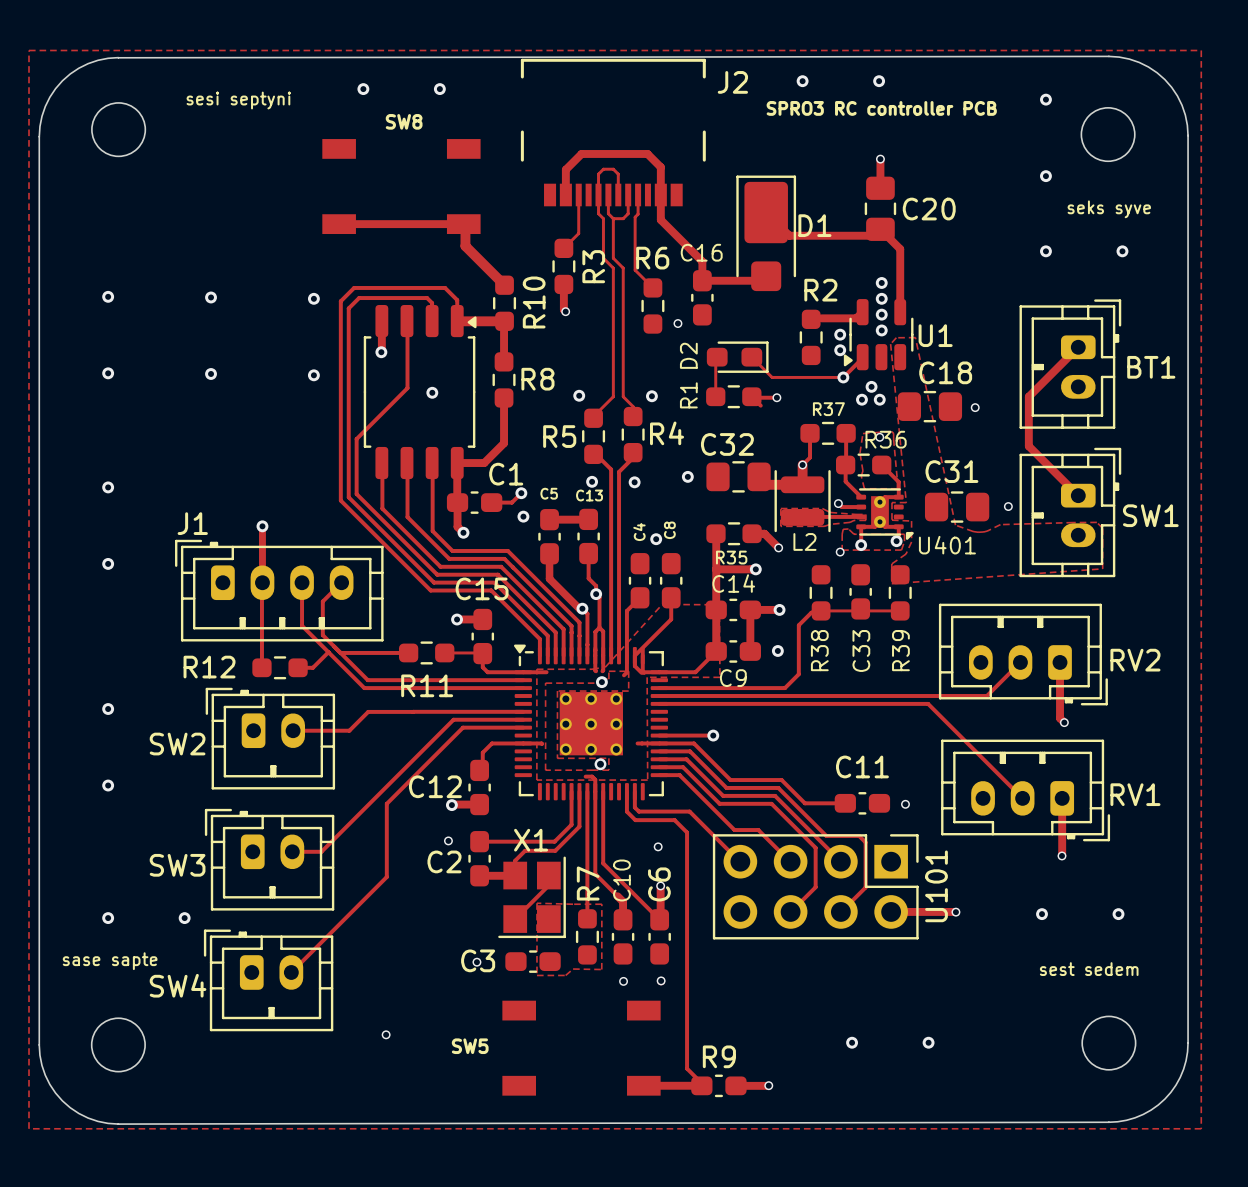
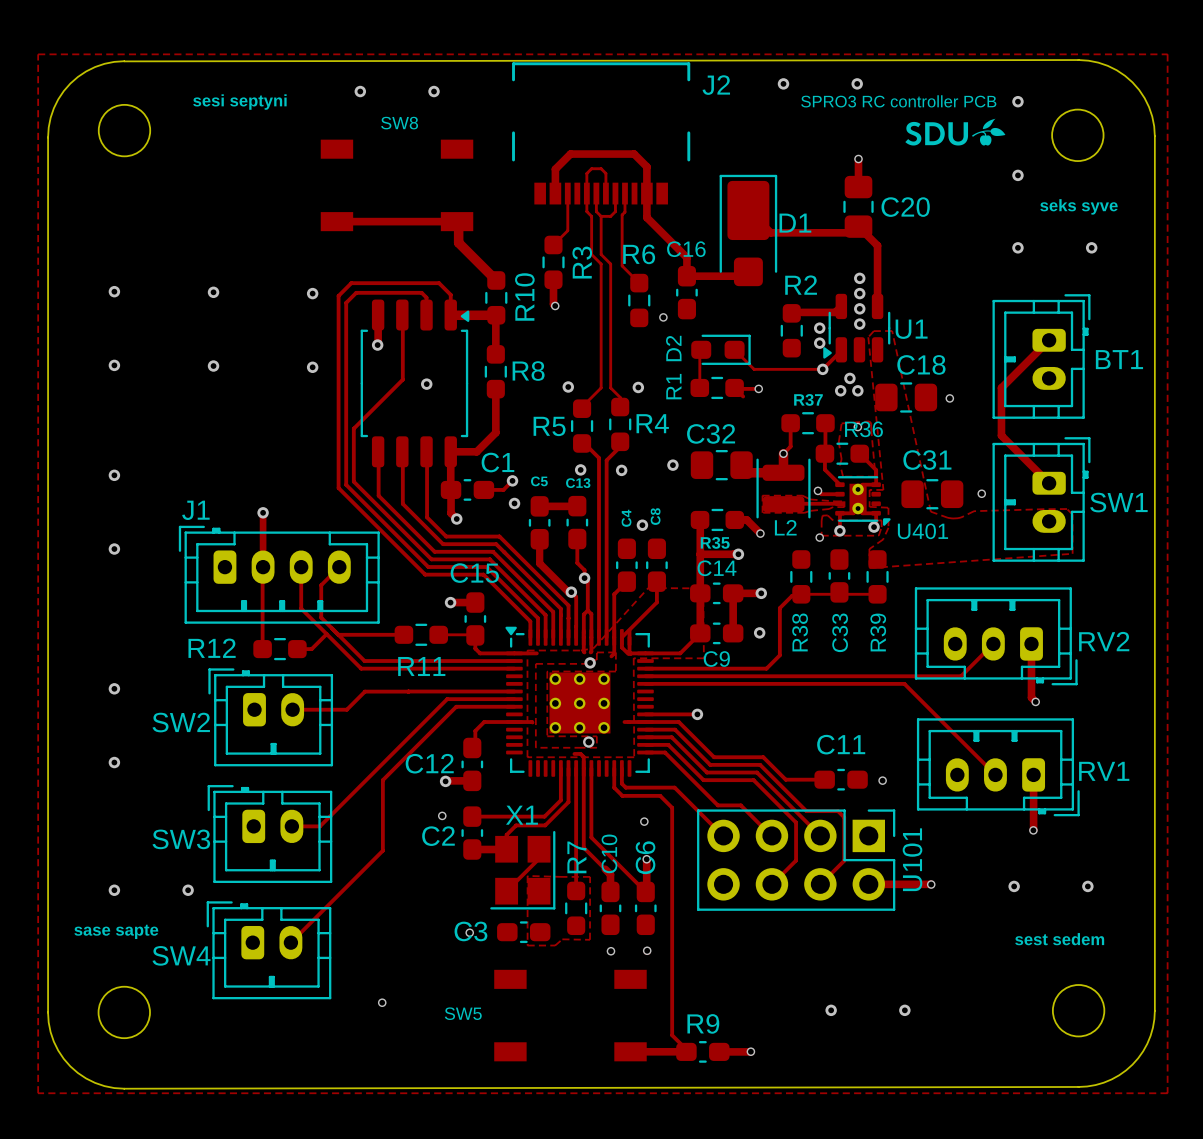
text position: SPRO3 RC controller PCB (881, 108) -> SPRO3 RC controller PCB (898, 101)
drawing: none -> [905, 118, 1006, 146]

